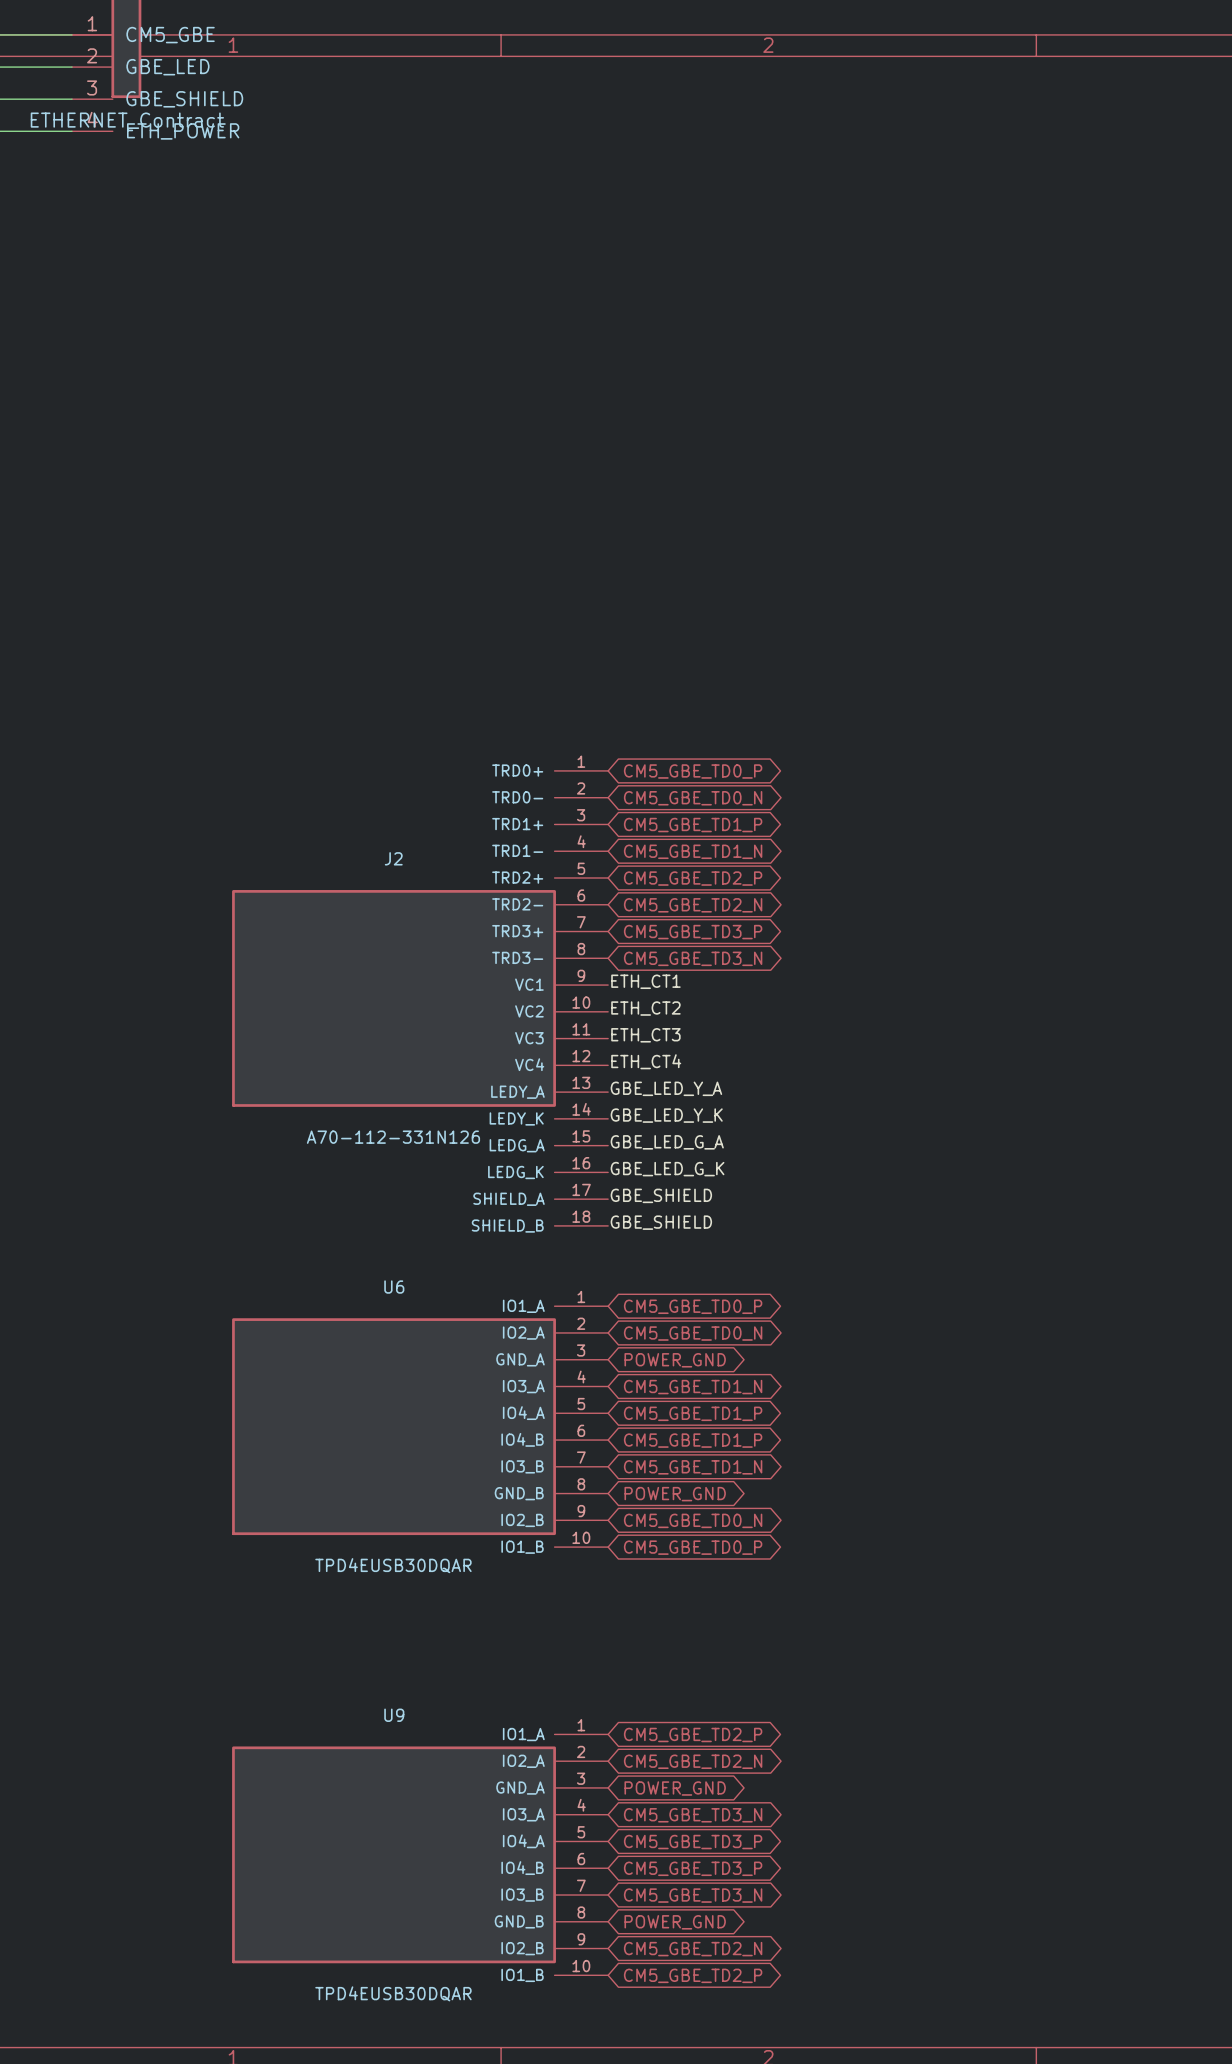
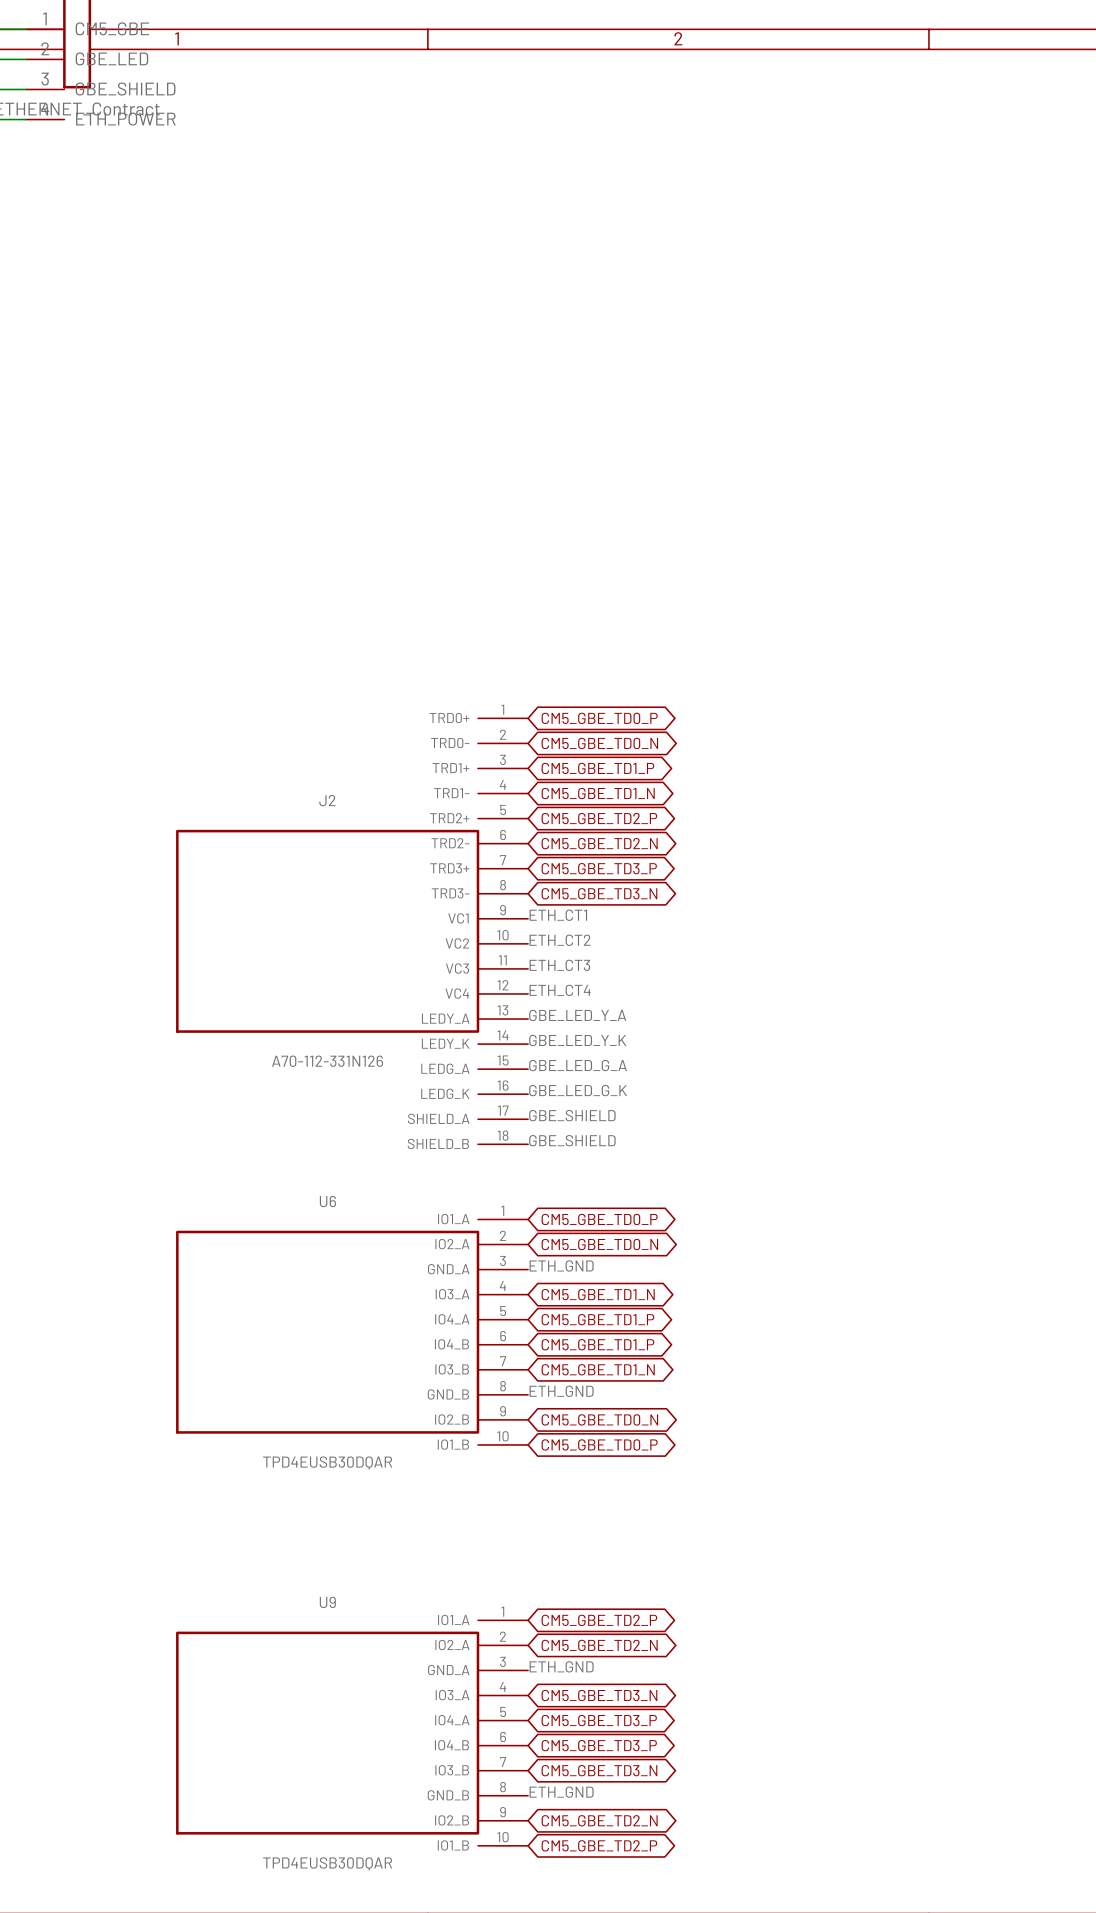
label: none -> ETH_GND (561, 1265)
global label: POWER_GND (675, 1360) -> none
label: none -> ETH_GND (561, 1391)
global label: POWER_GND (675, 1494) -> none
label: none -> ETH_GND (561, 1666)
global label: POWER_GND (675, 1788) -> none
label: none -> ETH_GND (561, 1792)
global label: POWER_GND (675, 1922) -> none

